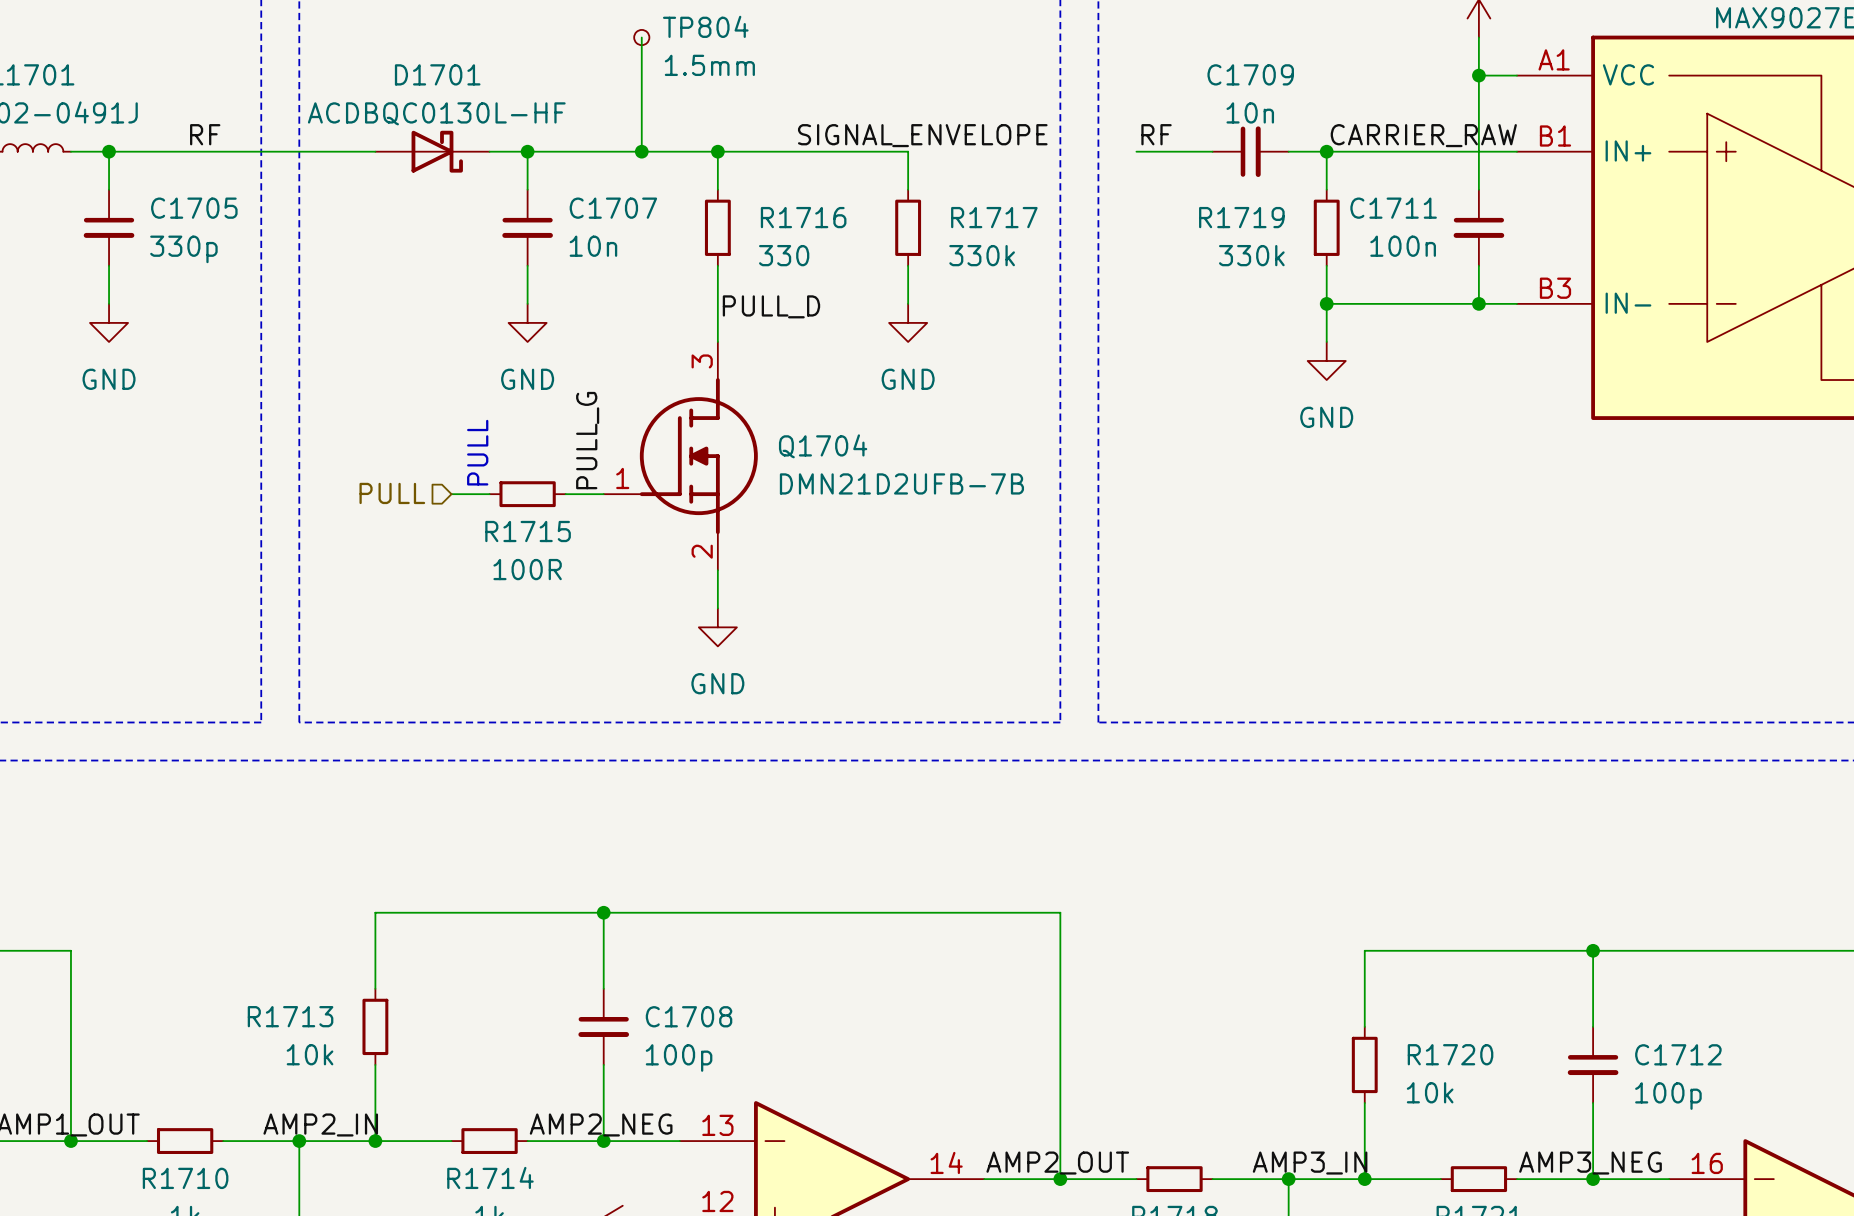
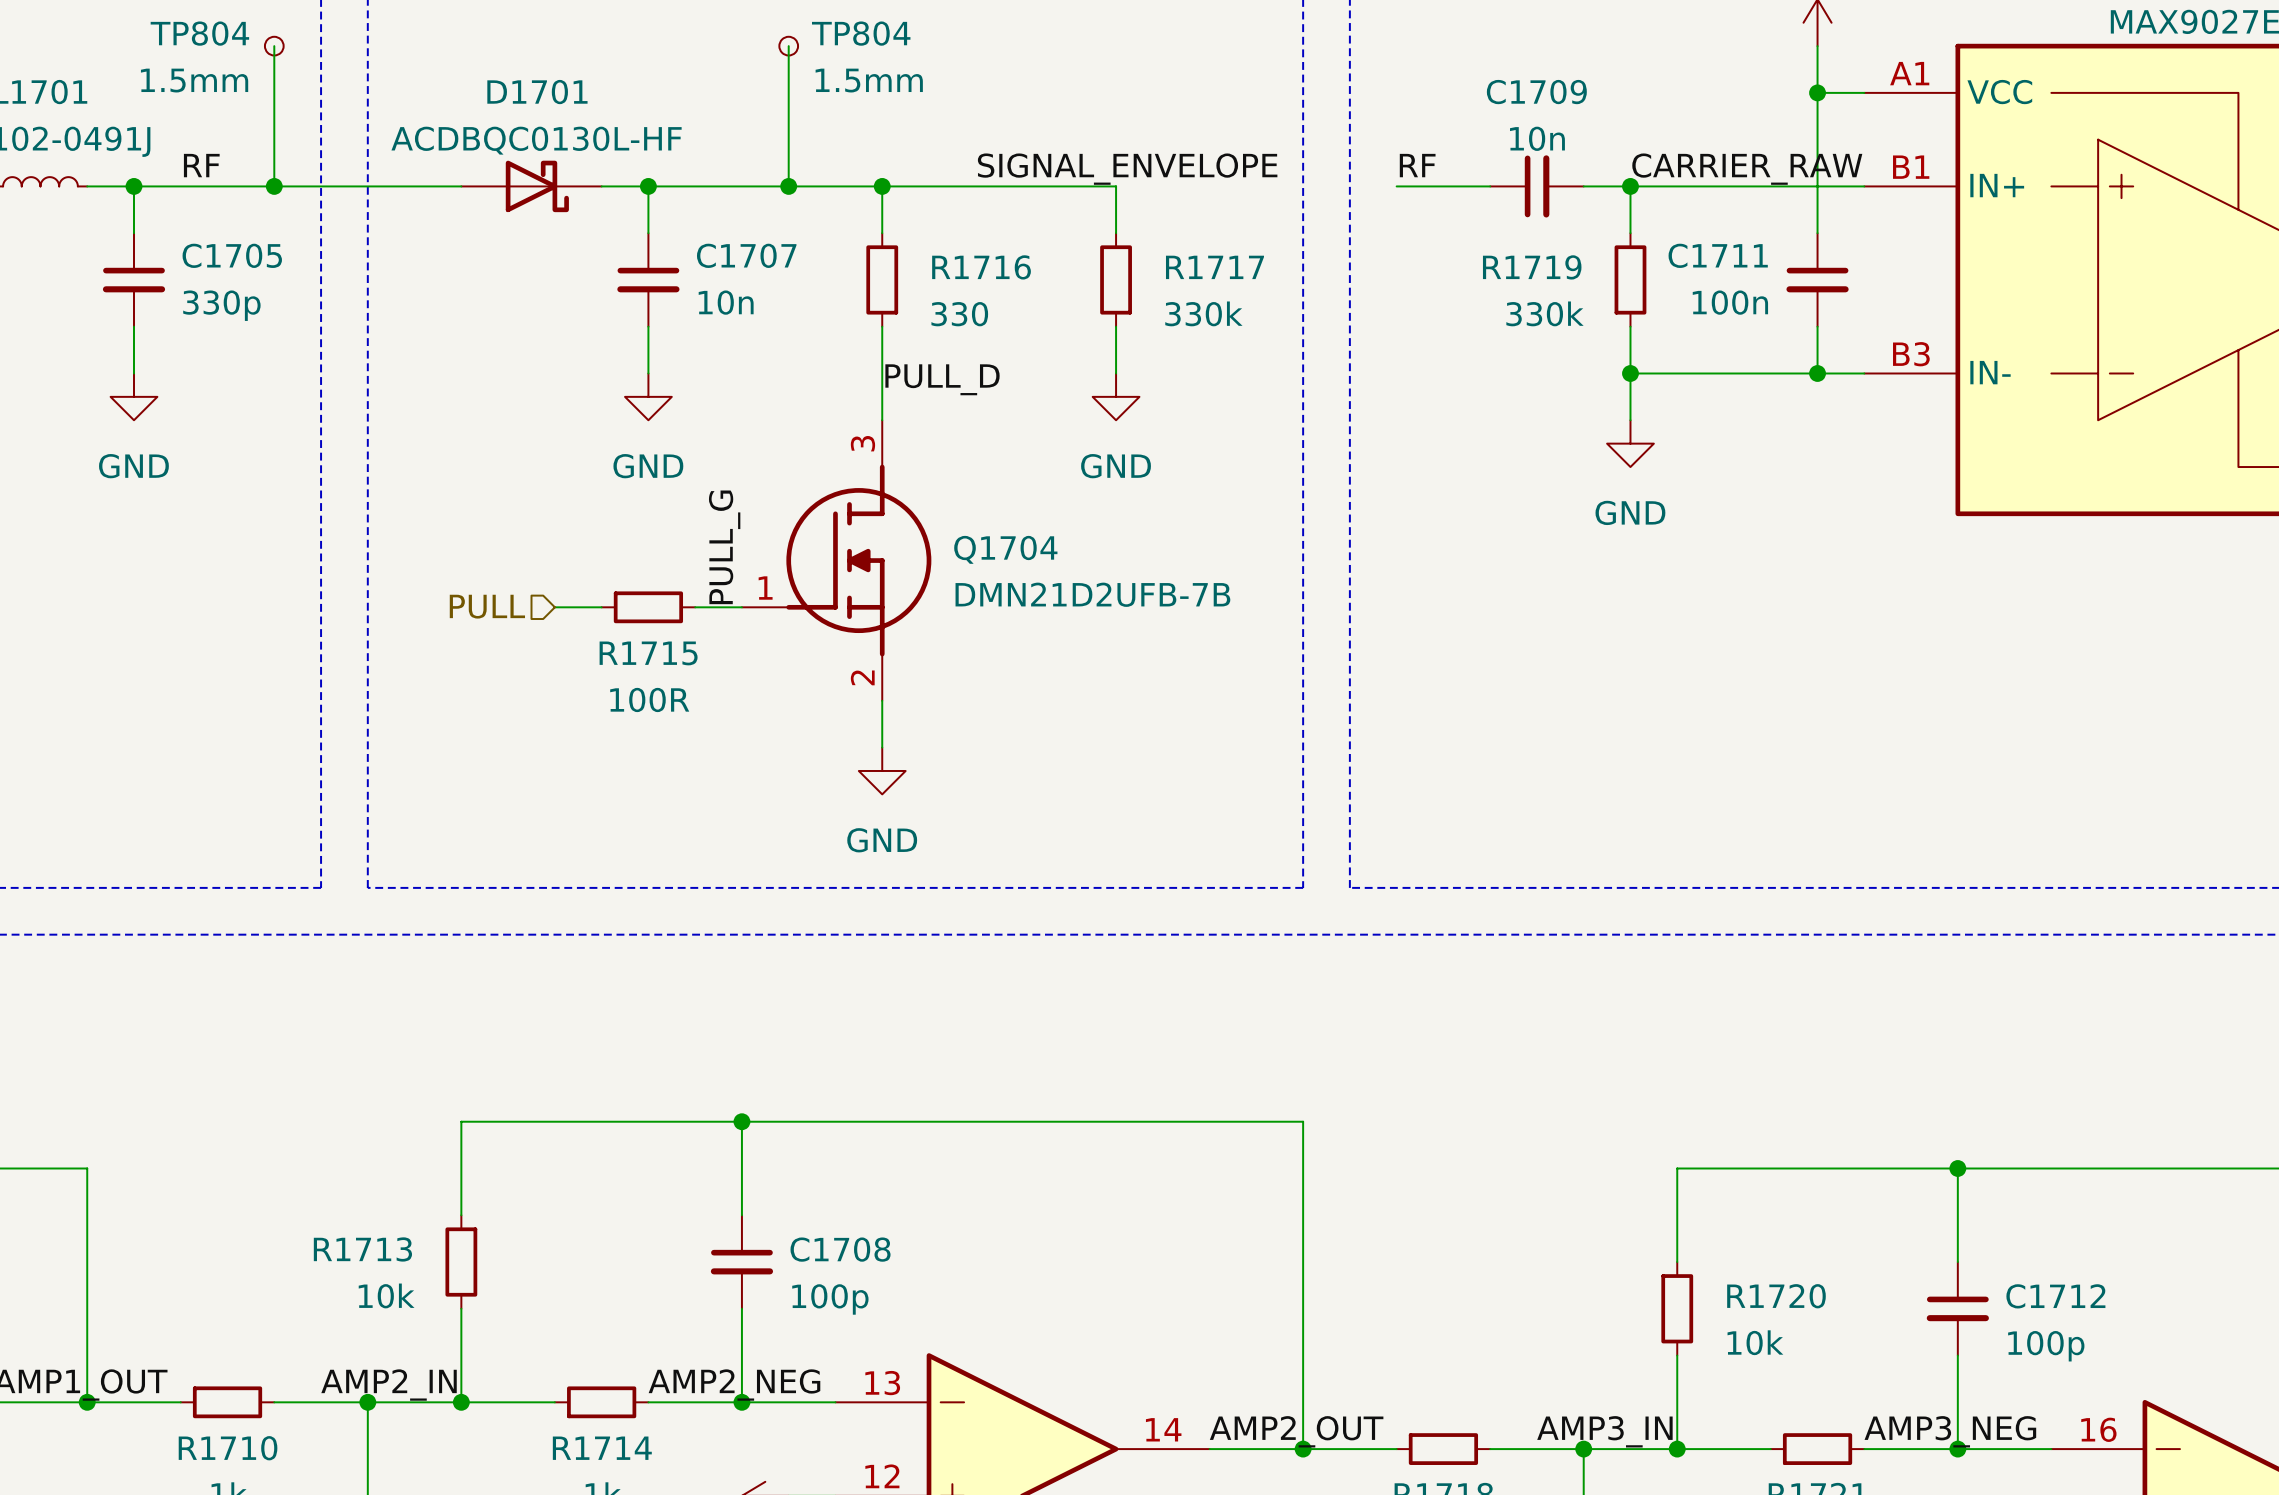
wire: none -> (274, 46) (274, 186)
TP804: none -> 1.5mm (274, 46)
label position: RF (205, 134) -> RF (201, 165)
junction: none -> (274, 186)
text: PULL (477, 452) -> none

